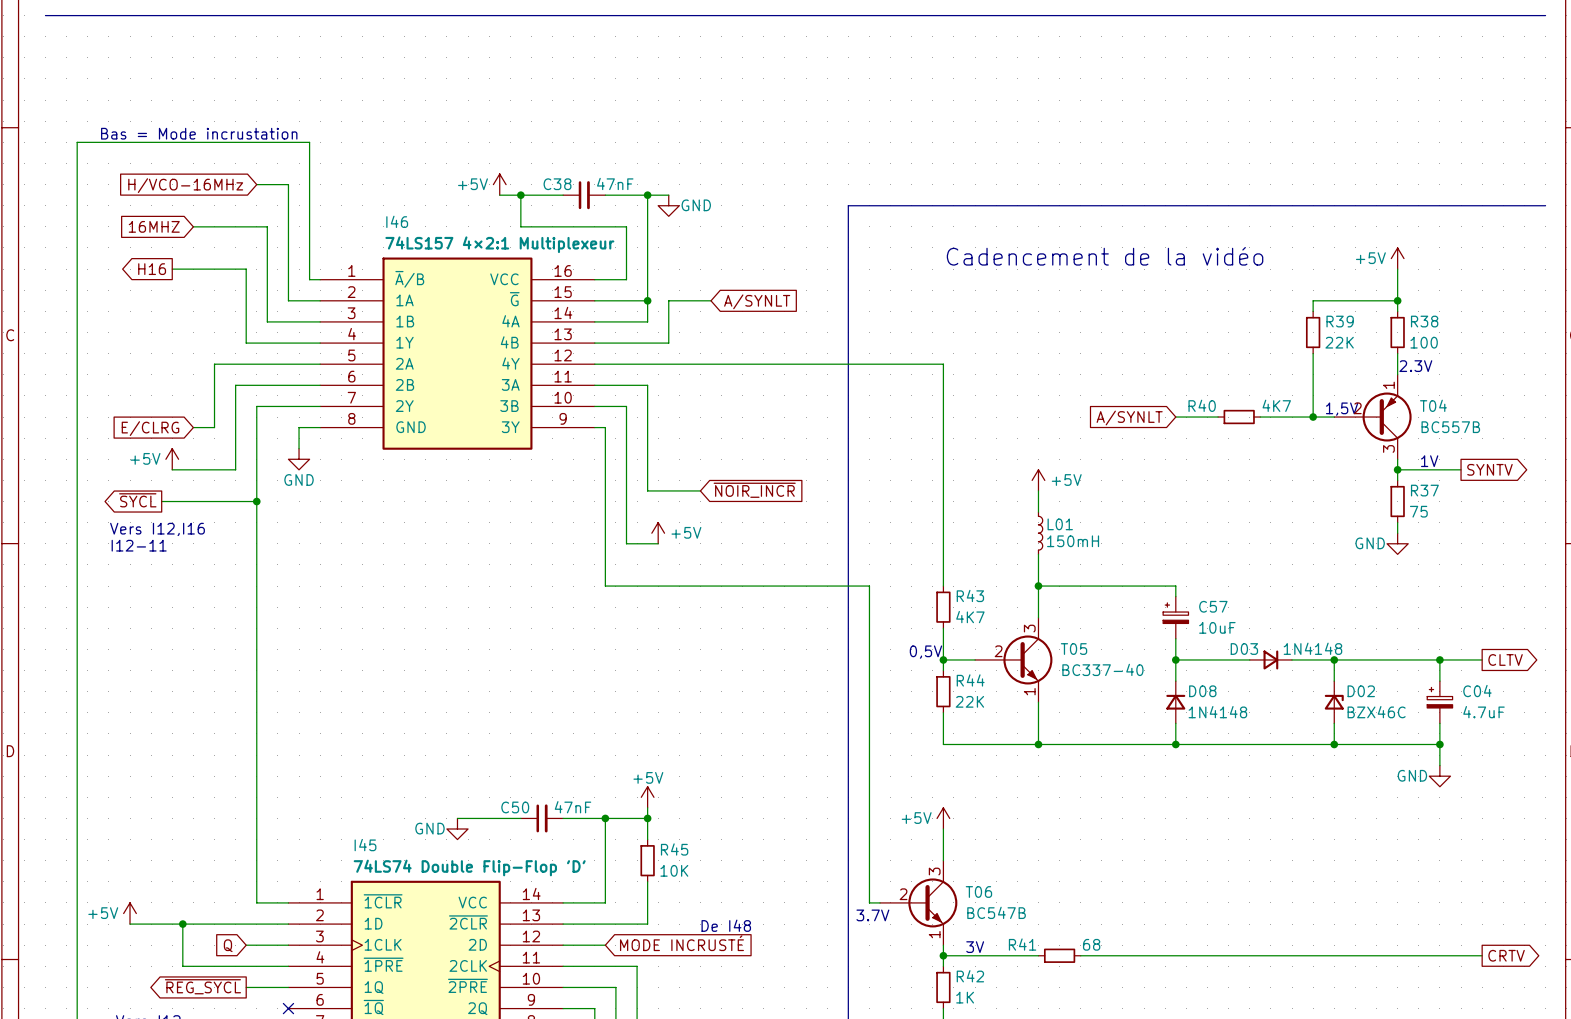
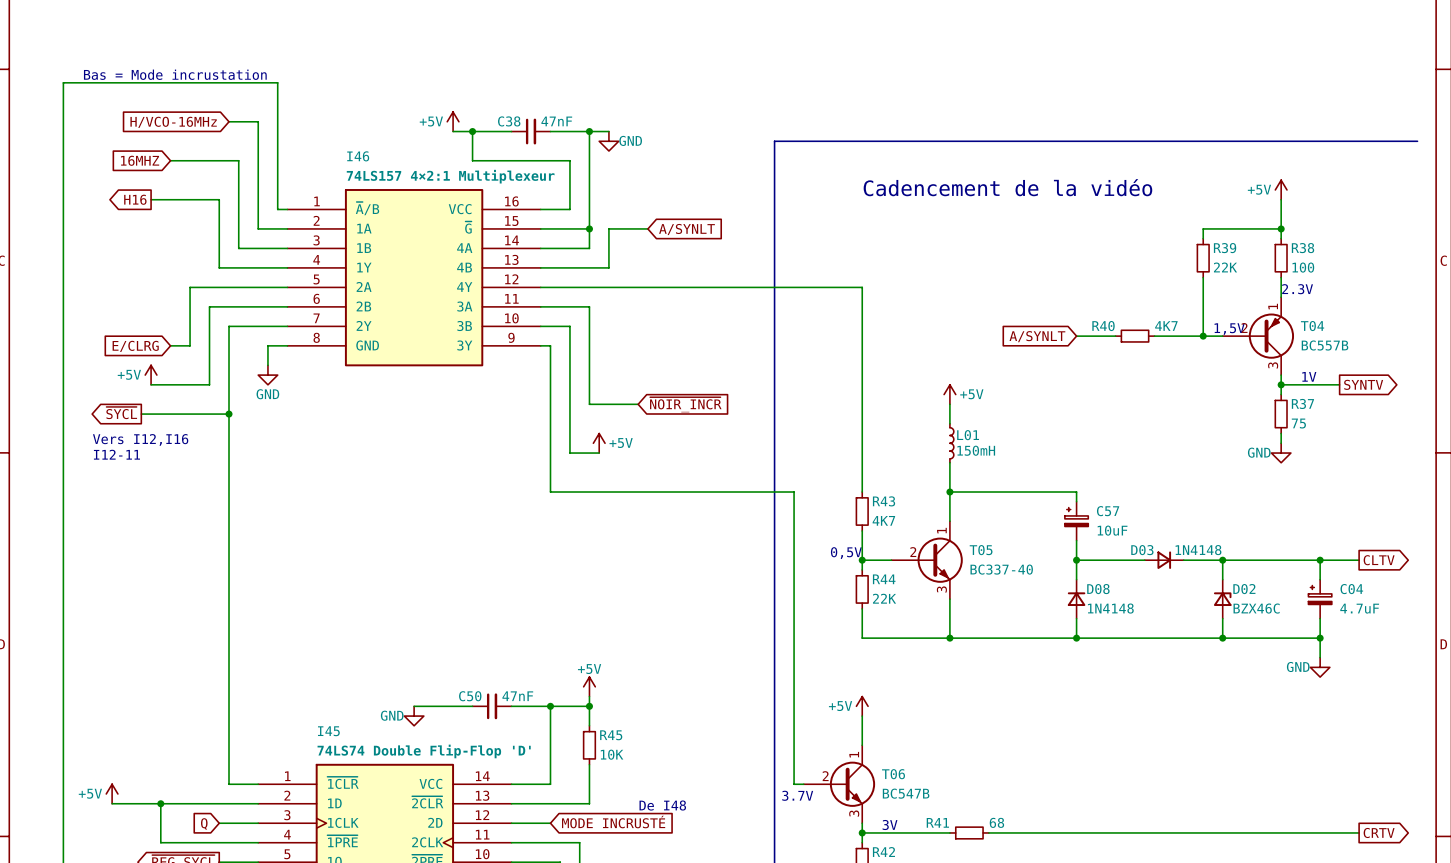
T05 pin number: 3 (1029, 628) -> 1 (941, 530)
T05 pin number: 1 (1029, 691) -> 3 (941, 589)
T06 pin number: 3 (934, 871) -> 1 (854, 754)
T06 pin number: 1 (934, 934) -> 3 (854, 813)

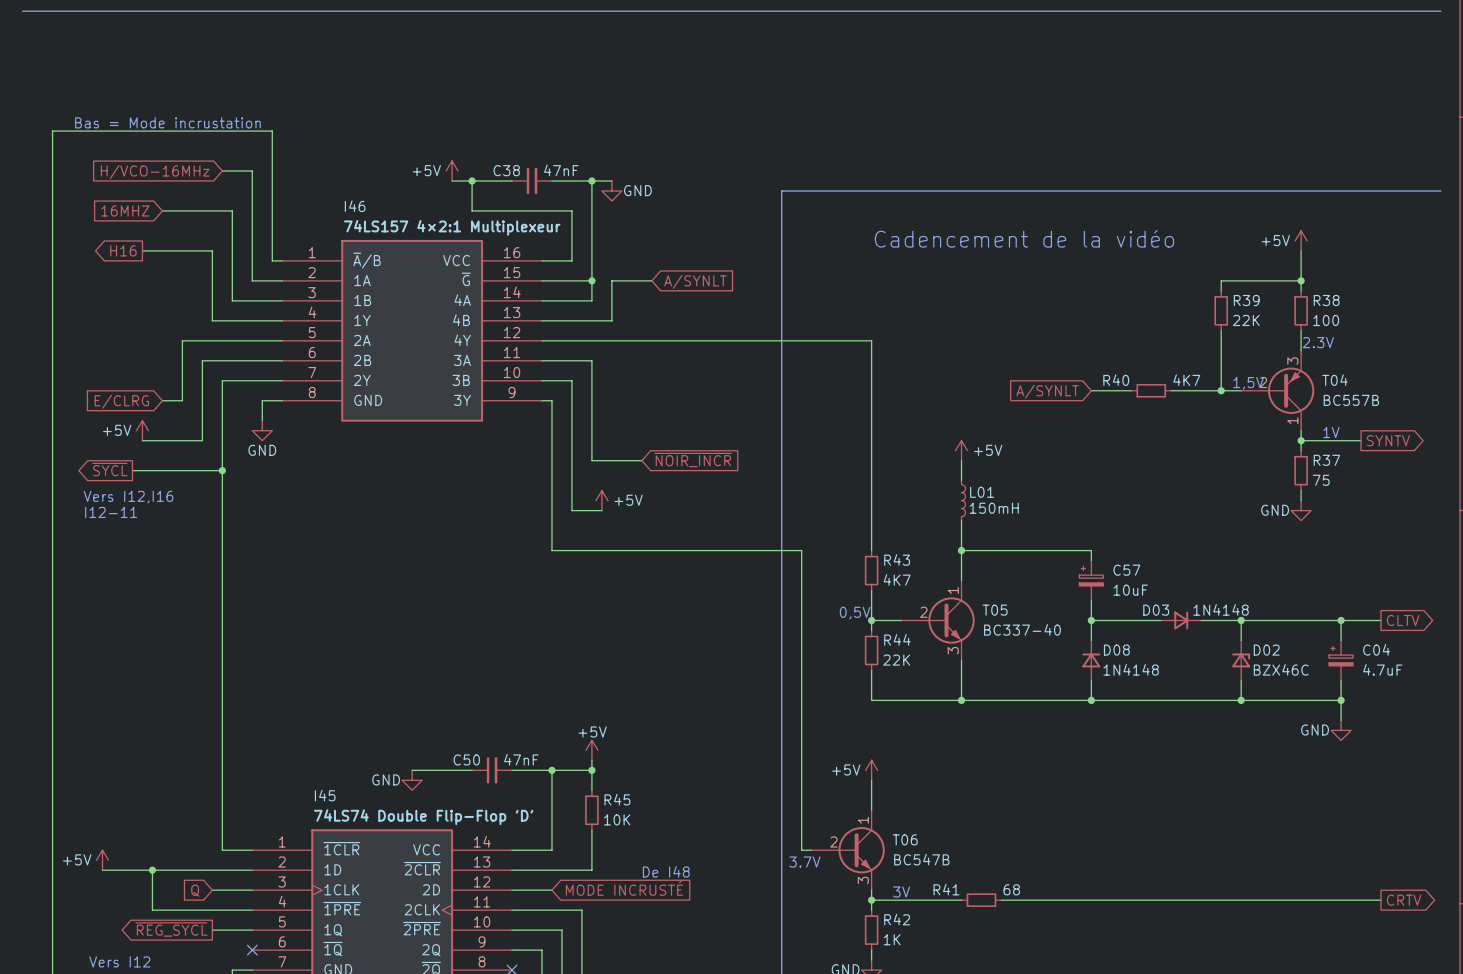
T04 pin number: 1 (1273, 306) -> 3 (1292, 361)
T04 pin number: 3 (1273, 365) -> 1 (1292, 420)

